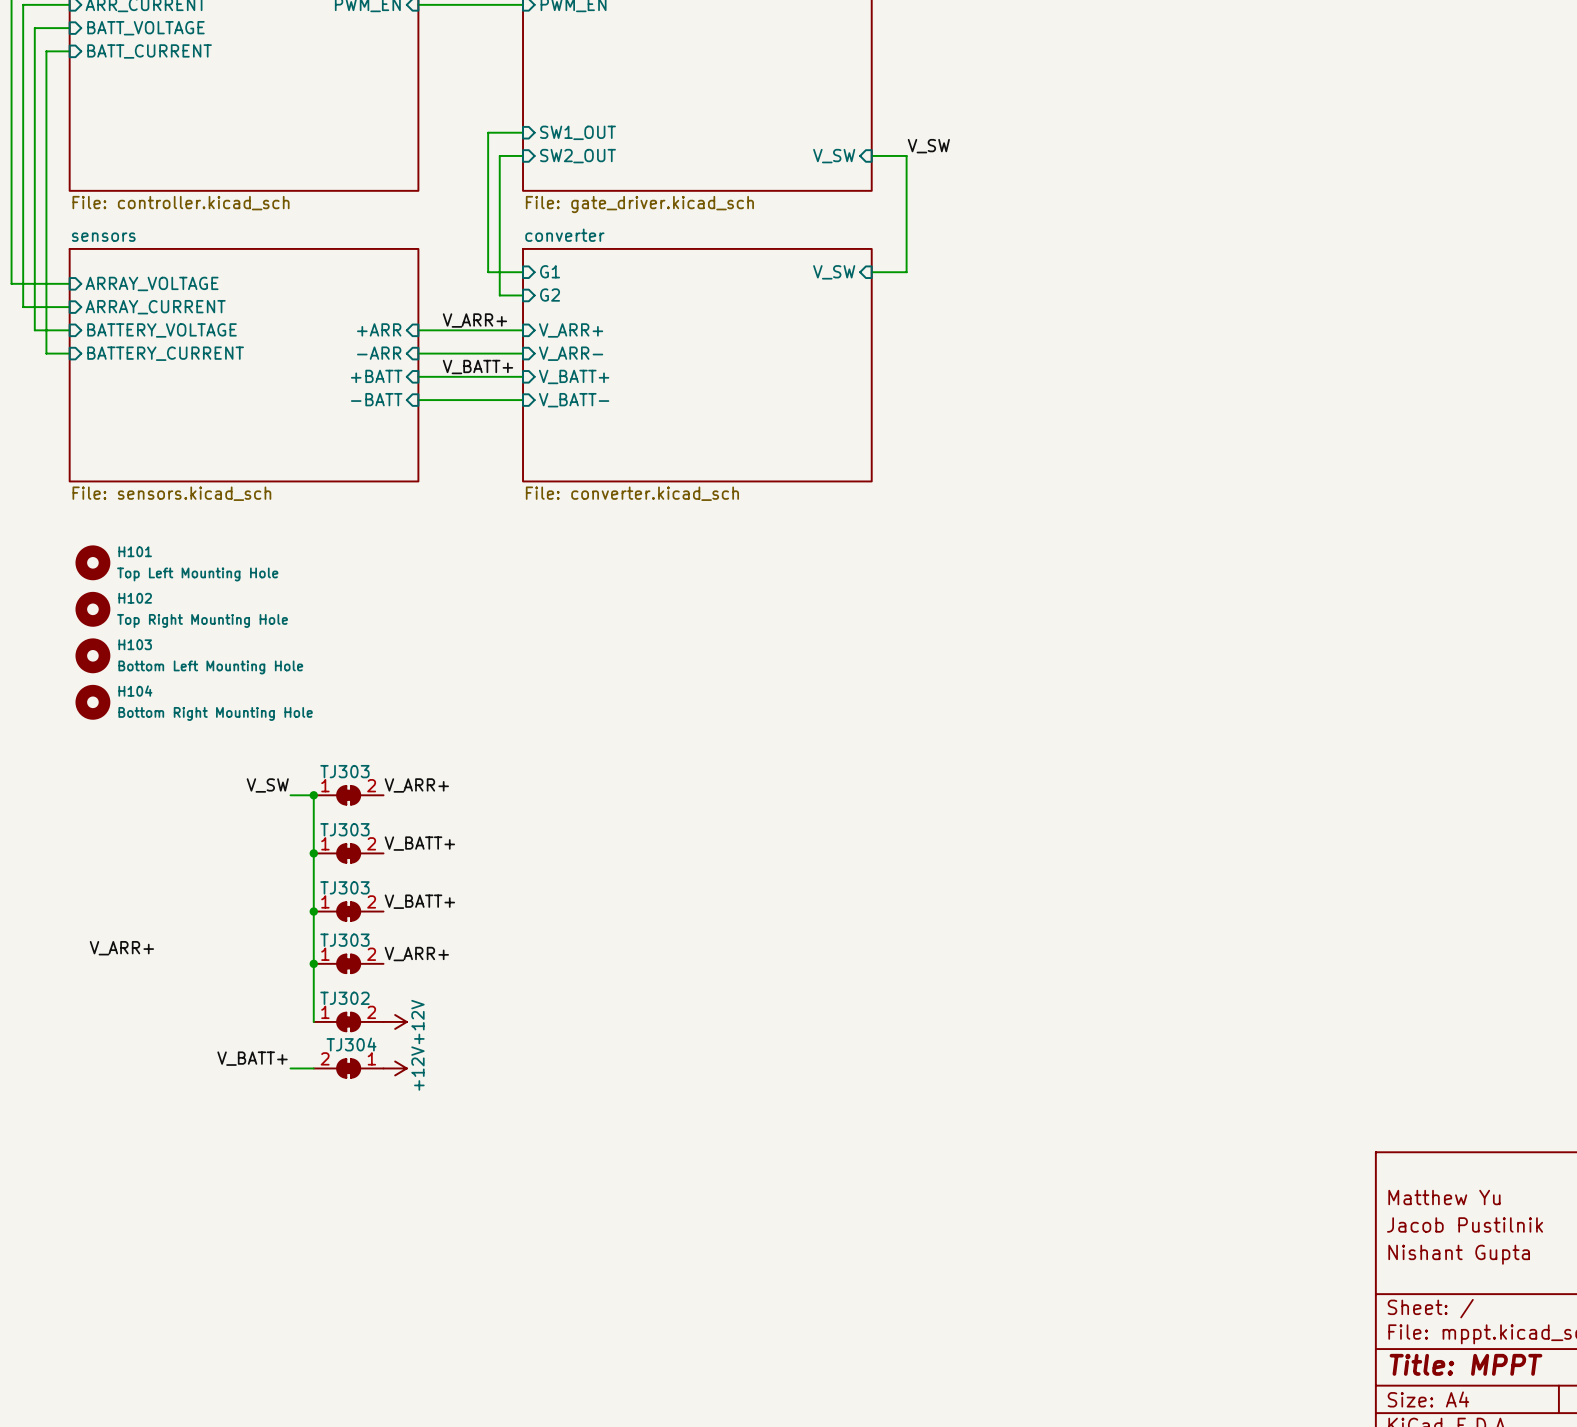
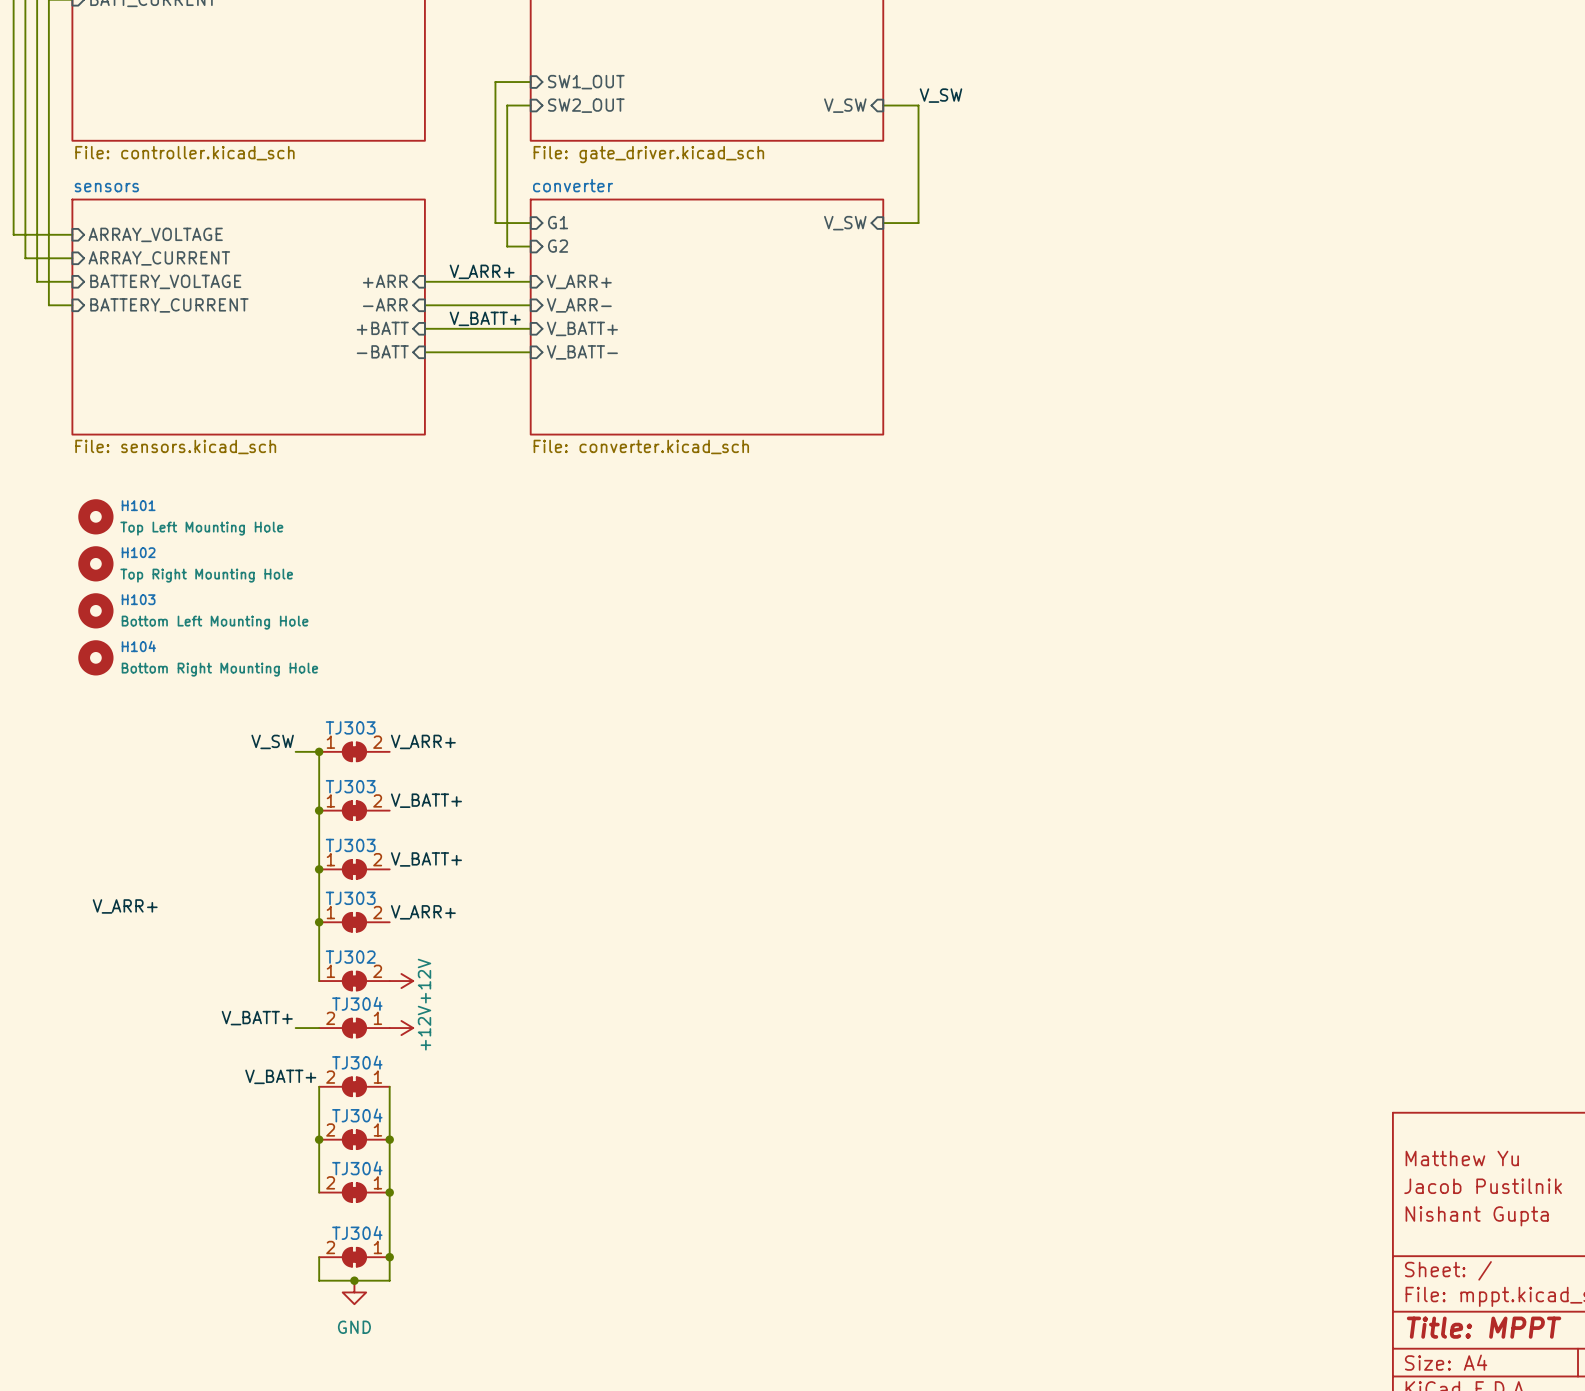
label: none -> V_BATT+ (280, 1076)
wire: none -> (319, 1086) (319, 1192)
TJ304: none -> (354, 1086)
wire: none -> (389, 1086) (389, 1280) (319, 1280) (319, 1257)
junction: none -> (319, 1139)
TJ304: none -> (354, 1139)
junction: none -> (389, 1139)
TJ304: none -> (354, 1192)
junction: none -> (389, 1192)
TJ304: none -> (354, 1257)
junction: none -> (389, 1257)
junction: none -> (354, 1280)
power symbol: none -> GND (354, 1292)

